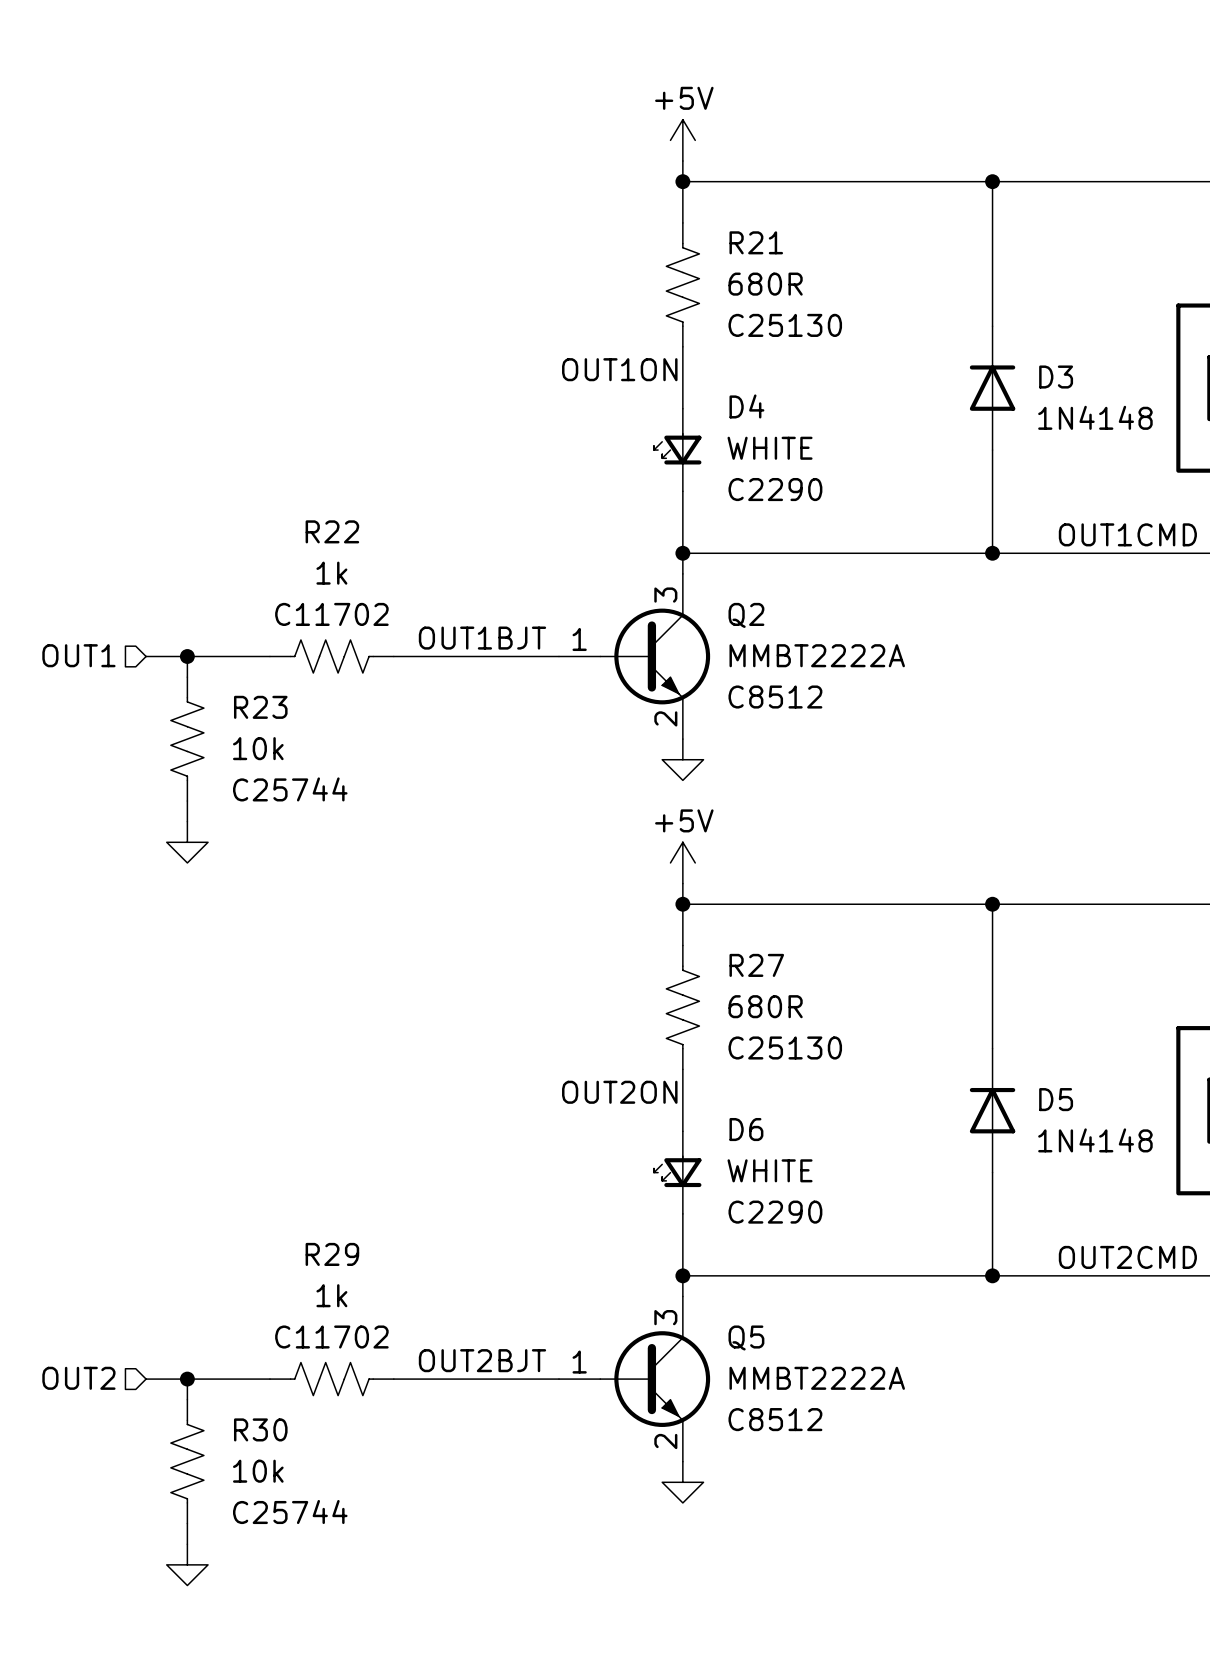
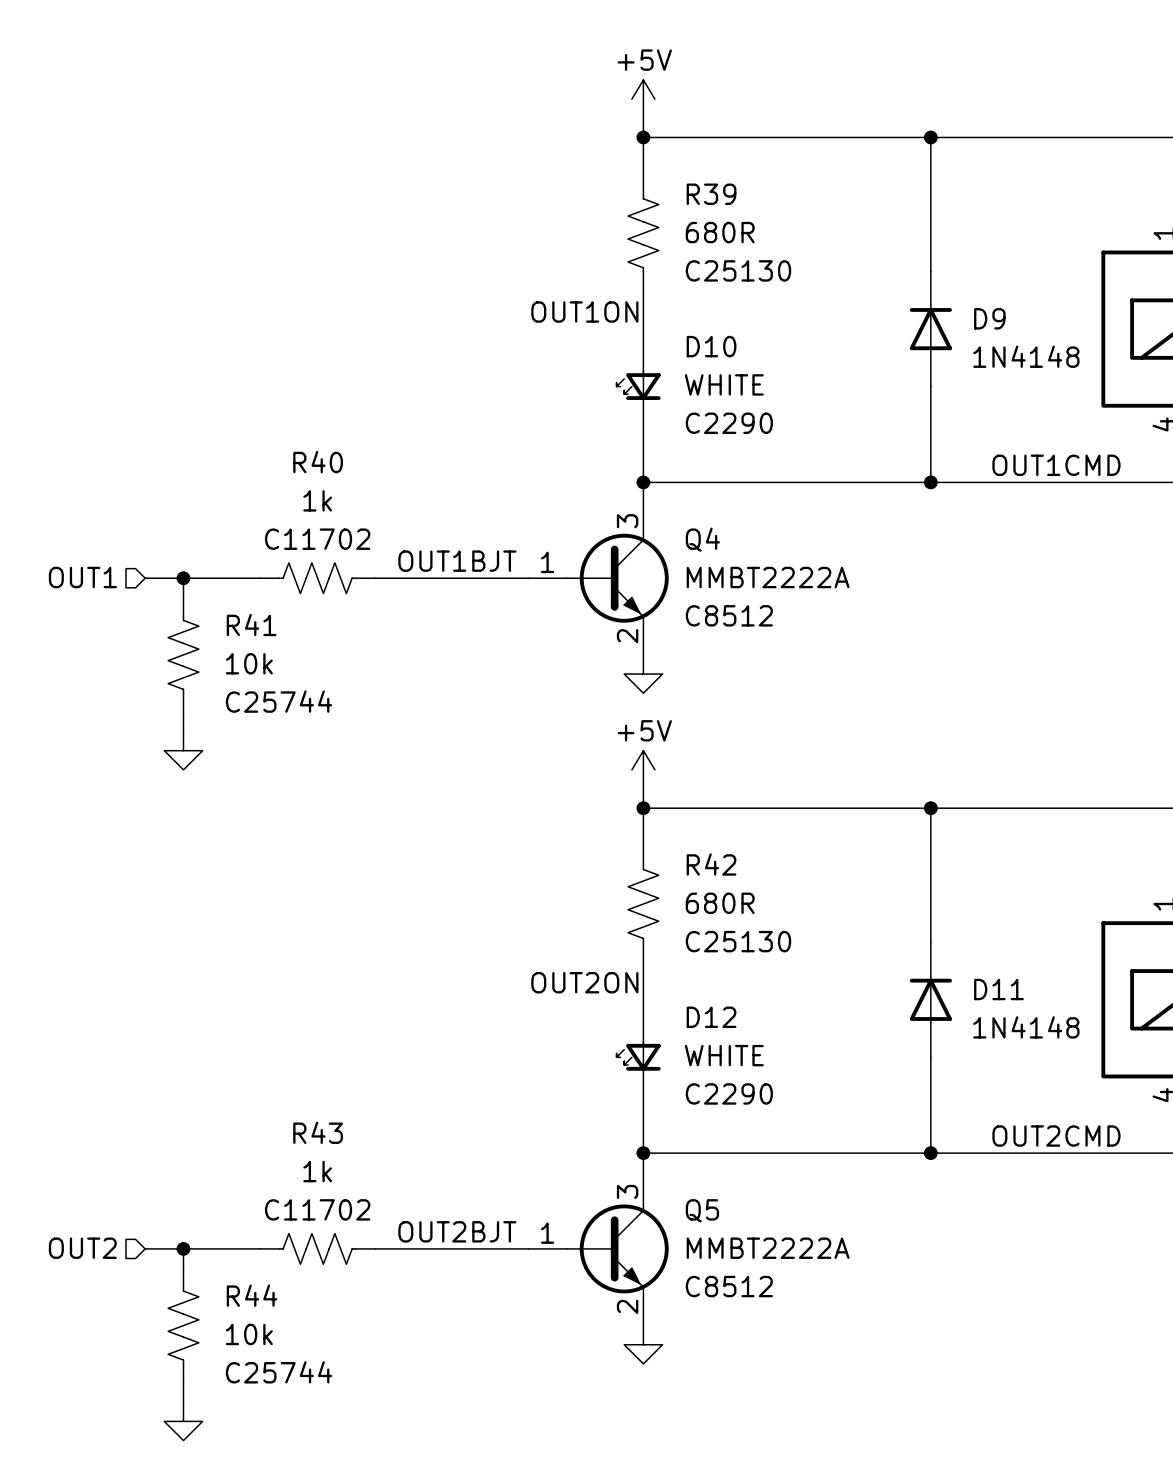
R21 name: R21 (756, 242) -> R39 (711, 194)
D3 name: D3 (1056, 377) -> D9 (989, 318)
D4 name: D4 (746, 406) -> D10 (711, 346)
R22 name: R22 (332, 531) -> R40 (318, 462)
Q2 name: Q2 (746, 615) -> Q4 (702, 539)
R23 name: R23 (260, 707) -> R41 (251, 624)
R27 name: R27 (756, 965) -> R42 (711, 864)
D5 name: D5 (1056, 1099) -> D11 (998, 989)
D6 name: D6 (746, 1129) -> D12 (711, 1017)
R29 name: R29 (332, 1254) -> R43 (318, 1132)
R30 name: R30 (260, 1429) -> R44 (252, 1295)

